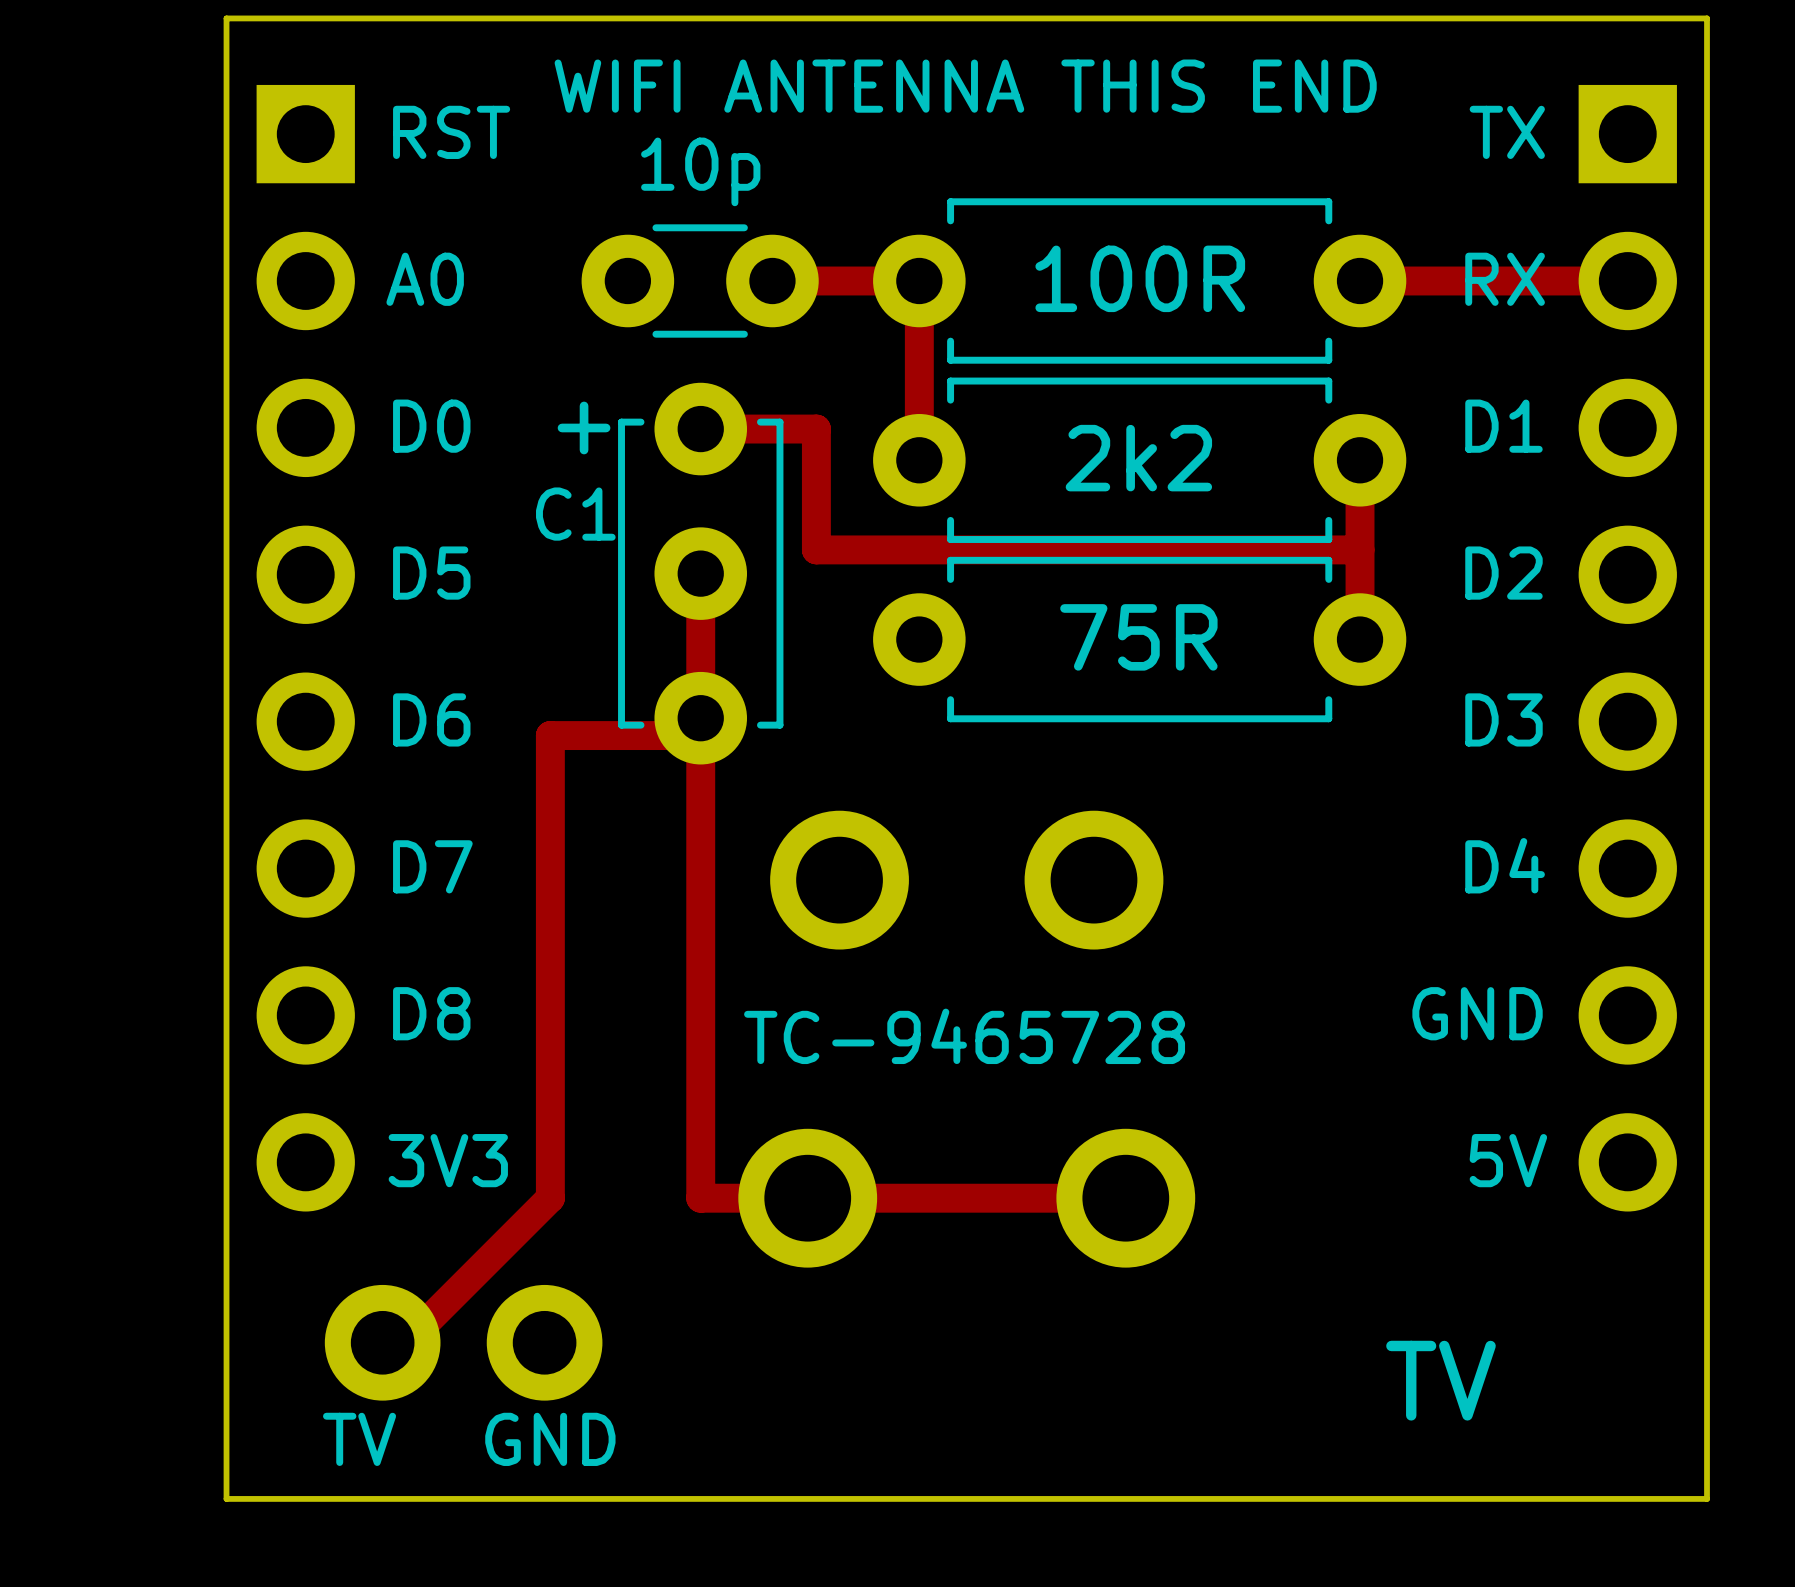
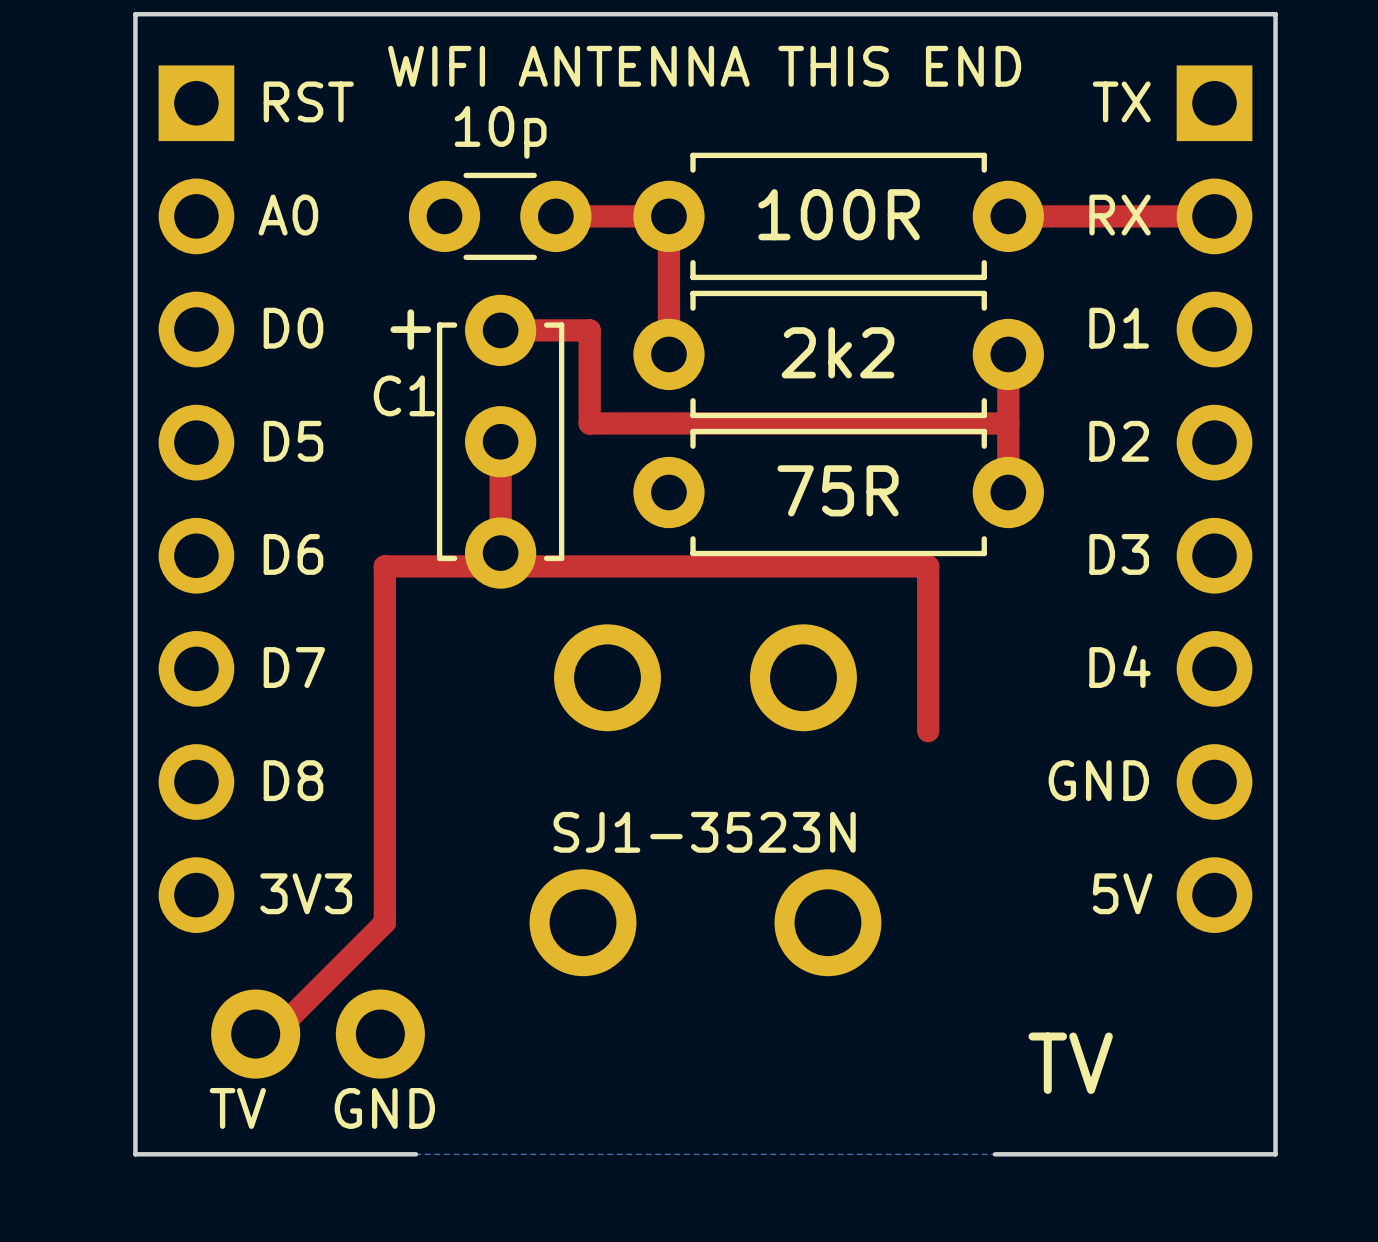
top track: (700, 735) (700, 1198) (1125, 1198) -> (500, 566) (928, 566) (928, 731)
text: TC-9465728 (964, 1036) -> SJ1-3523N (704, 832)
board edge: (590, 1498) (1342, 1498) -> none

